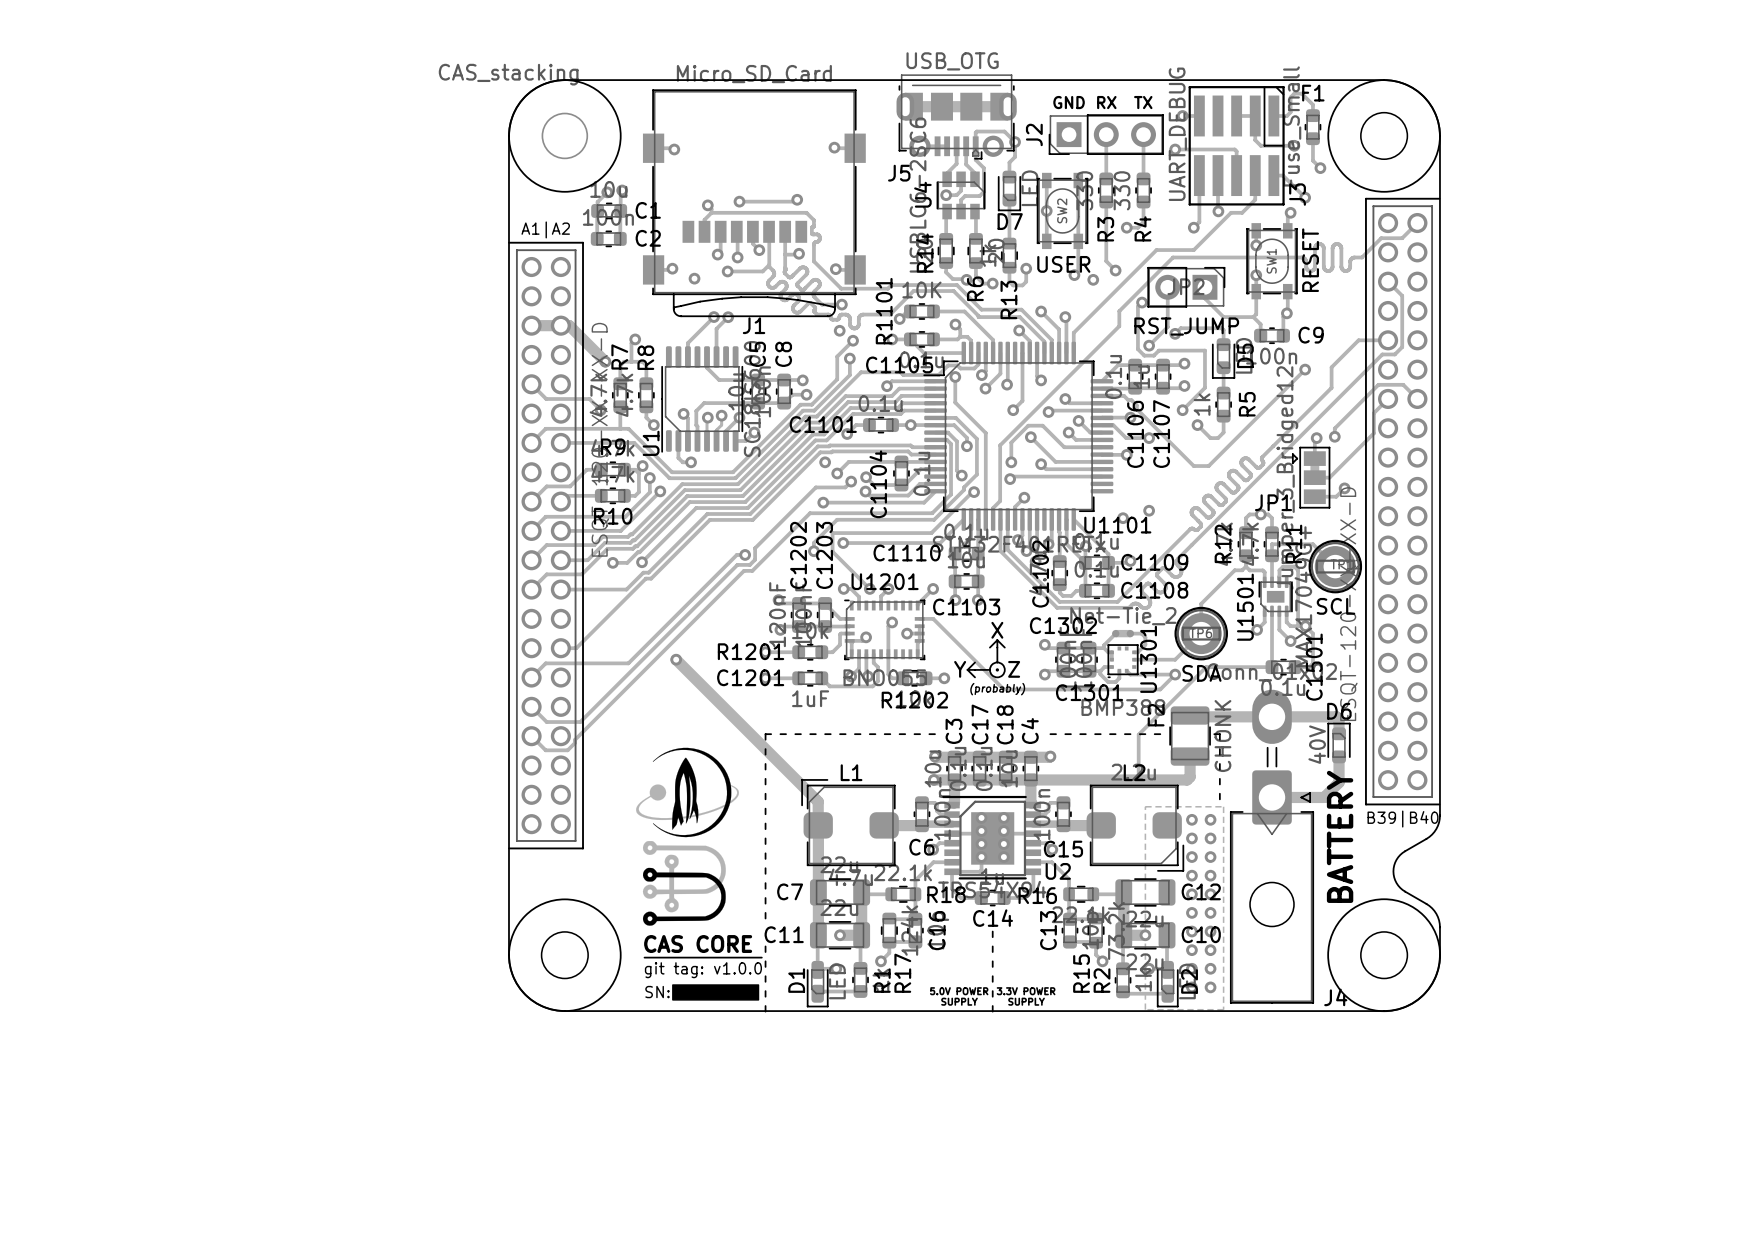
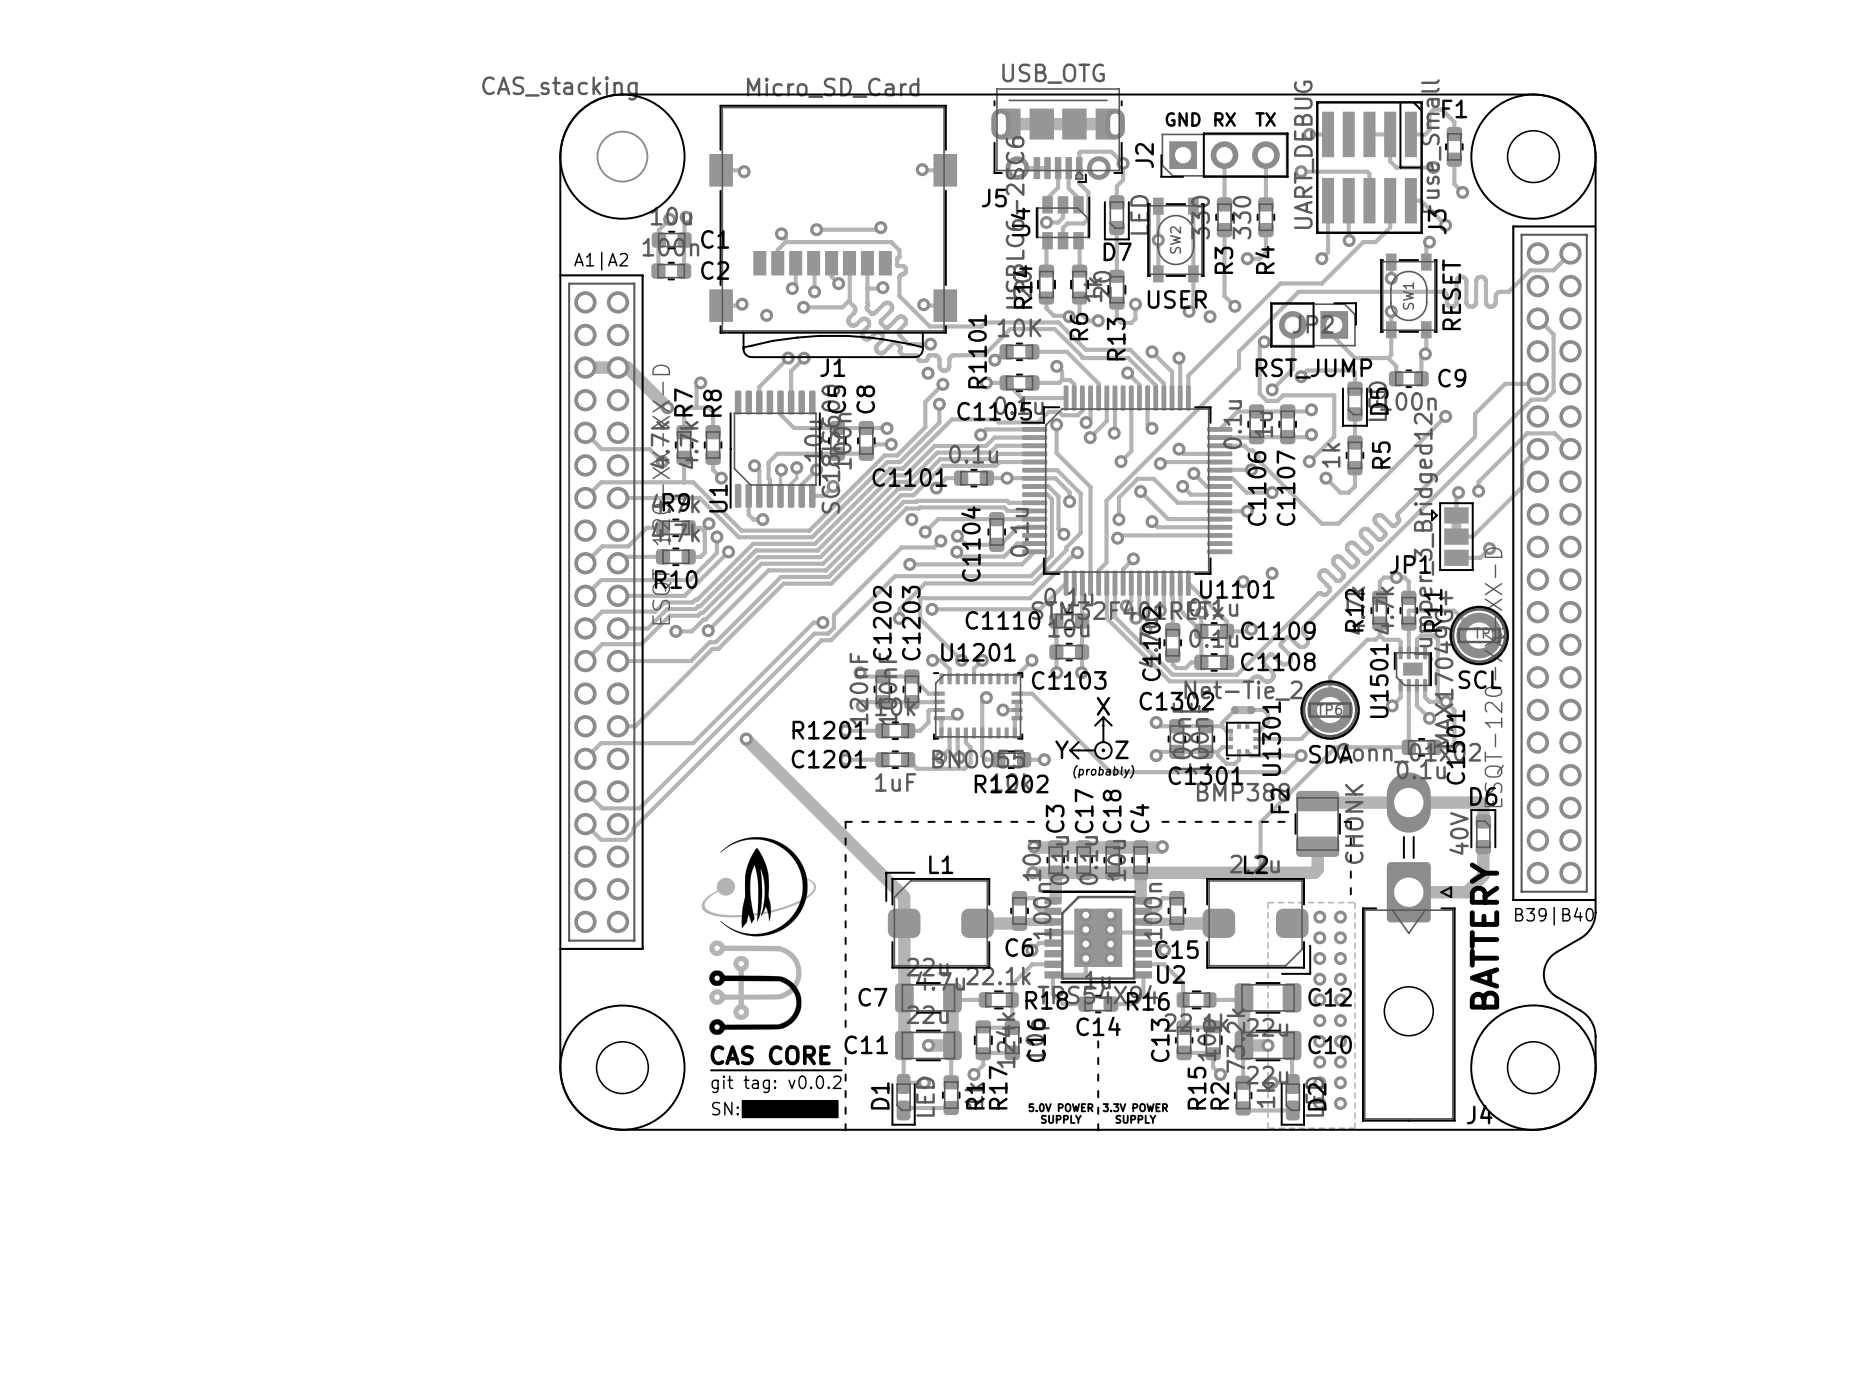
text: git tag: v1.0.0 (703, 970) -> git tag: v0.0.2 (776, 1084)

